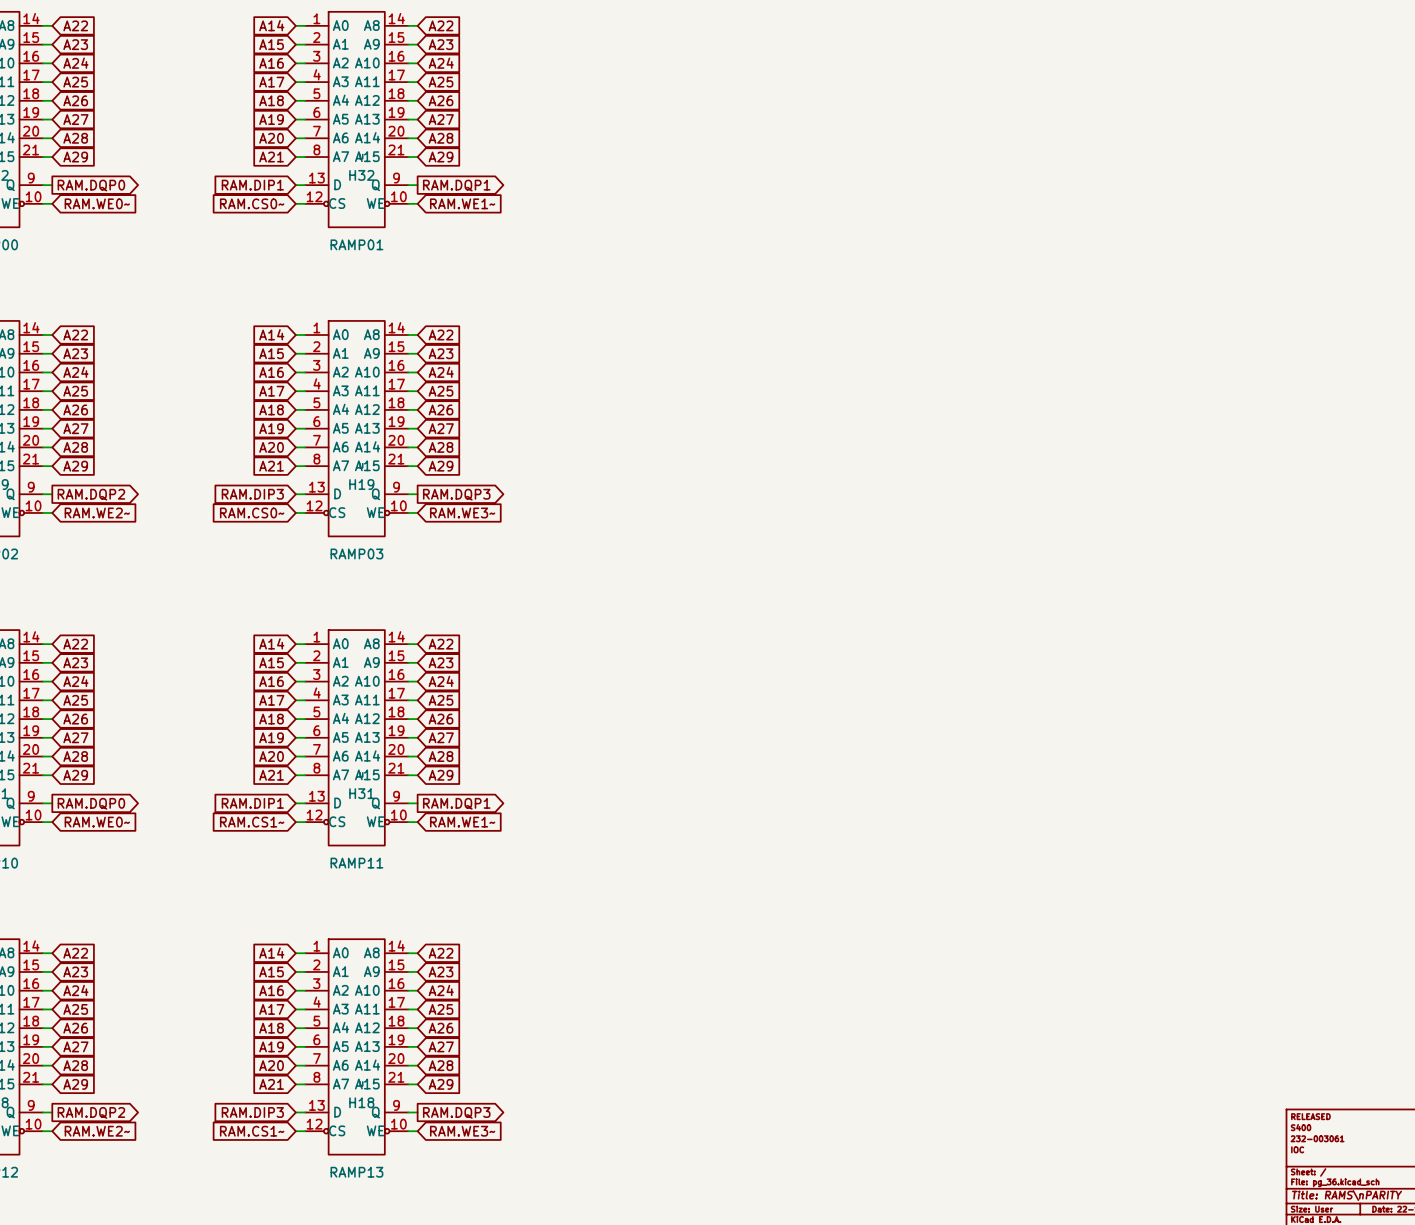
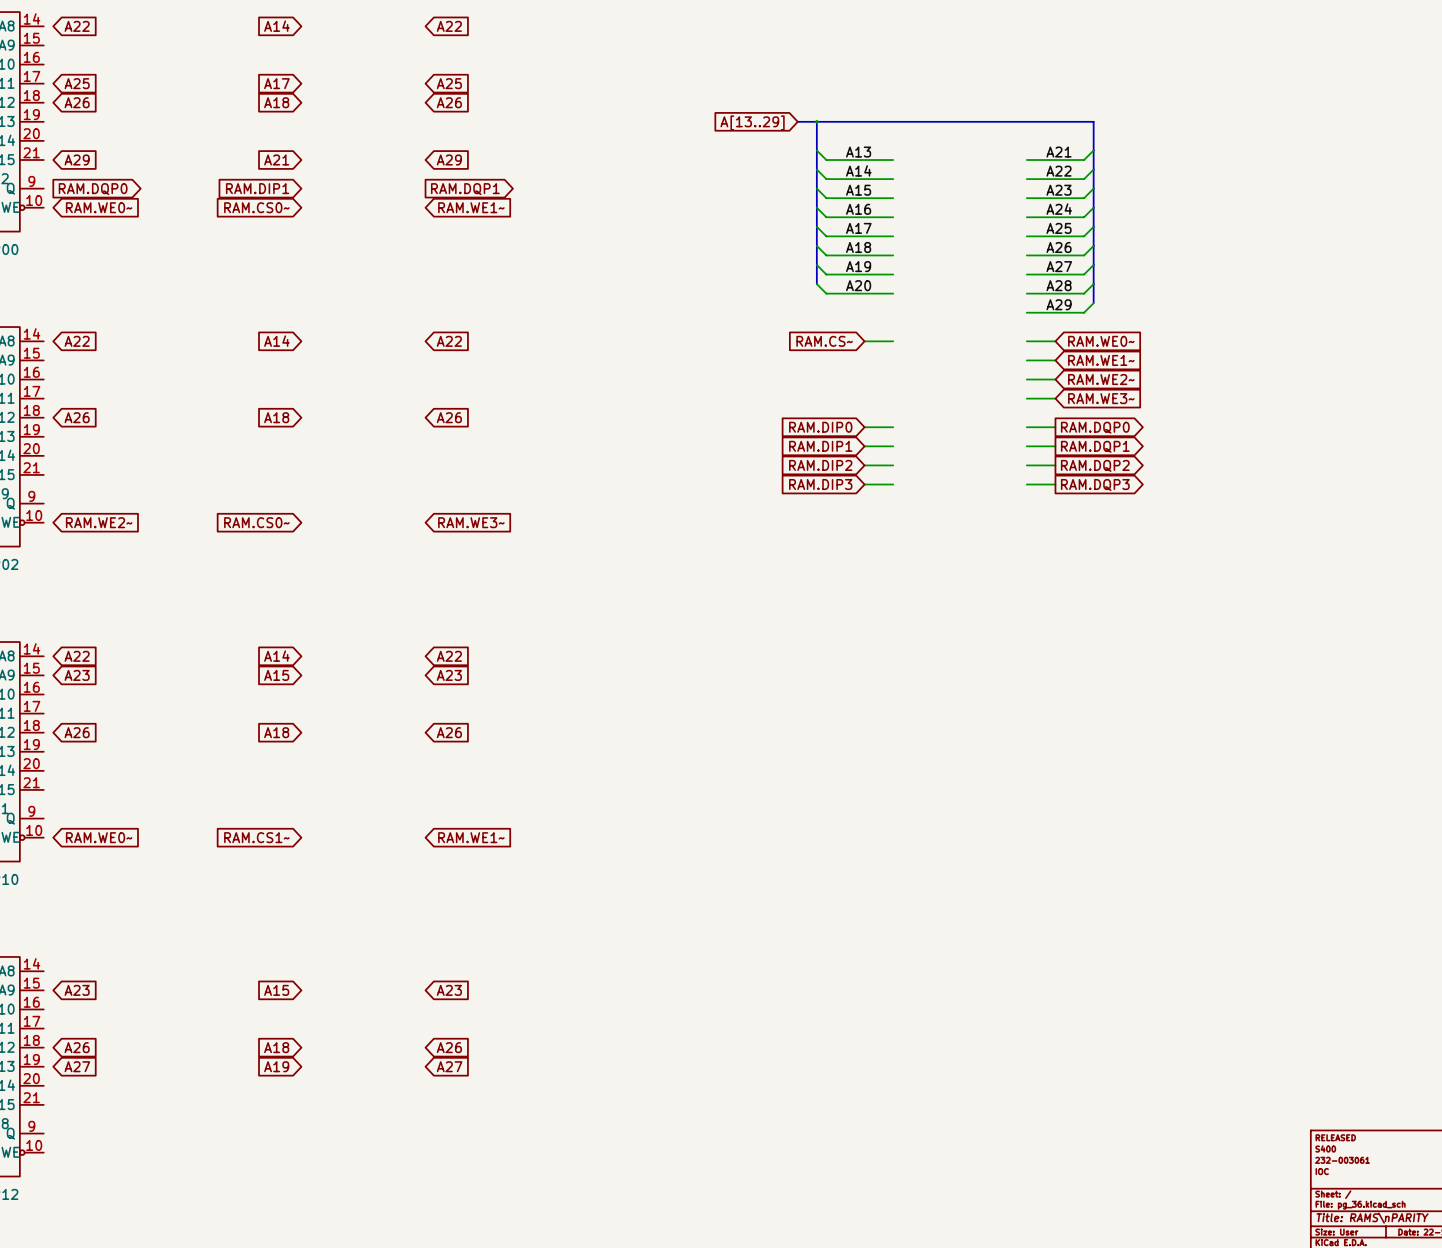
wire: (42, 25) (52, 25) -> none
wire: (295, 25) (305, 25) -> none
wire: (408, 25) (417, 25) -> none
wire: (42, 44) (52, 44) -> none
global label: A23 (75, 44) -> none
global label: A15 (271, 44) -> none
wire: (295, 44) (305, 44) -> none
wire: (408, 44) (417, 44) -> none
global label: A23 (441, 44) -> none
wire: (42, 63) (52, 63) -> none
global label: A24 (75, 63) -> none
global label: A16 (271, 63) -> none
wire: (295, 63) (305, 63) -> none
wire: (408, 63) (417, 63) -> none
global label: A24 (441, 63) -> none
wire: (42, 82) (52, 82) -> none
wire: (295, 82) (305, 82) -> none
wire: (408, 82) (417, 82) -> none
wire: (42, 100) (52, 100) -> none
wire: (295, 100) (305, 100) -> none
wire: (408, 100) (417, 100) -> none
wire: (42, 119) (52, 119) -> none
global label: A27 (75, 119) -> none
global label: A19 (271, 119) -> none
wire: (295, 119) (305, 119) -> none
part: (356, 119) -> none
wire: (408, 119) (417, 119) -> none
global label: A27 (441, 119) -> none
bus: none -> (797, 121) (1093, 121) (1093, 303)
bus: none -> (816, 121) (816, 284)
junction: none -> (816, 121)
global label: none -> A[13..29] (752, 122)
wire: (42, 138) (52, 138) -> none
global label: A28 (75, 138) -> none
global label: A20 (271, 138) -> none
wire: (295, 138) (305, 138) -> none
wire: (408, 138) (417, 138) -> none
global label: A28 (441, 138) -> none
wire: none -> (816, 150) (826, 160) (893, 160)
wire: none -> (1093, 150) (1084, 160) (1026, 160)
label: none -> A13 (858, 152)
label: none -> A21 (1059, 152)
wire: (42, 157) (52, 157) -> none
wire: (295, 157) (305, 157) -> none
wire: (408, 157) (417, 157) -> none
wire: none -> (816, 169) (826, 179) (893, 179)
wire: none -> (1093, 169) (1084, 179) (1026, 179)
label: none -> A14 (858, 170)
label: none -> A22 (1059, 171)
wire: (42, 185) (52, 185) -> none
wire: (295, 185) (305, 185) -> none
wire: (408, 185) (417, 185) -> none
wire: none -> (816, 188) (826, 198) (893, 198)
wire: none -> (1093, 188) (1084, 198) (1026, 198)
label: none -> A15 (858, 190)
label: none -> A23 (1059, 190)
wire: (42, 203) (52, 203) -> none
wire: (295, 203) (305, 203) -> none
wire: (408, 203) (417, 203) -> none
wire: none -> (816, 207) (826, 217) (893, 217)
wire: none -> (1093, 207) (1084, 217) (1026, 217)
label: none -> A16 (858, 209)
label: none -> A24 (1059, 209)
wire: none -> (816, 226) (826, 236) (893, 236)
wire: none -> (1093, 226) (1084, 236) (1026, 236)
label: none -> A17 (858, 228)
label: none -> A25 (1059, 228)
wire: none -> (816, 245) (826, 255) (893, 255)
wire: none -> (1093, 245) (1084, 255) (1026, 255)
label: none -> A18 (858, 247)
label: none -> A26 (1059, 247)
wire: none -> (816, 264) (826, 274) (893, 274)
wire: none -> (1093, 264) (1084, 274) (1026, 274)
label: none -> A19 (858, 266)
label: none -> A27 (1059, 266)
wire: none -> (816, 284) (826, 293) (893, 293)
wire: none -> (1093, 284) (1084, 293) (1026, 293)
label: none -> A20 (858, 285)
label: none -> A28 (1059, 285)
wire: none -> (1093, 303) (1084, 312) (1026, 312)
label: none -> A29 (1059, 304)
wire: (42, 335) (52, 335) -> none
wire: (295, 335) (305, 335) -> none
wire: (408, 335) (417, 335) -> none
global label: none -> RAM.CS~ (824, 341)
wire: none -> (864, 341) (893, 341)
wire: none -> (1026, 341) (1055, 341)
global label: none -> RAM.WE0~ (1101, 341)
wire: (42, 353) (52, 353) -> none
global label: A23 (75, 353) -> none
global label: A15 (271, 353) -> none
wire: (295, 353) (305, 353) -> none
wire: (408, 353) (417, 353) -> none
global label: A23 (441, 353) -> none
wire: none -> (1026, 360) (1055, 360)
global label: none -> RAM.WE1~ (1101, 360)
wire: (42, 372) (52, 372) -> none
global label: A24 (75, 372) -> none
global label: A16 (271, 372) -> none
wire: (295, 372) (305, 372) -> none
wire: (408, 372) (417, 372) -> none
global label: A24 (441, 372) -> none
wire: none -> (1026, 379) (1055, 379)
global label: none -> RAM.WE2~ (1101, 379)
wire: (42, 391) (52, 391) -> none
global label: A25 (75, 391) -> none
global label: A17 (271, 391) -> none
wire: (295, 391) (305, 391) -> none
wire: (408, 391) (417, 391) -> none
global label: A25 (441, 391) -> none
wire: none -> (1026, 398) (1055, 398)
global label: none -> RAM.WE3~ (1101, 398)
wire: (42, 409) (52, 409) -> none
wire: (295, 409) (305, 409) -> none
wire: (408, 409) (417, 409) -> none
global label: none -> RAM.DIP0 (820, 427)
wire: none -> (864, 427) (893, 427)
wire: none -> (1026, 427) (1055, 427)
global label: none -> RAM.DQP0 (1095, 427)
wire: (42, 428) (52, 428) -> none
global label: A27 (75, 428) -> none
global label: A19 (271, 428) -> none
wire: (295, 428) (305, 428) -> none
part: (356, 428) -> none
wire: (408, 428) (417, 428) -> none
global label: A27 (441, 428) -> none
global label: none -> RAM.DIP1 (820, 446)
wire: none -> (864, 446) (893, 446)
wire: none -> (1026, 446) (1055, 446)
global label: none -> RAM.DQP1 (1095, 446)
wire: (42, 447) (52, 447) -> none
global label: A28 (75, 447) -> none
global label: A20 (271, 447) -> none
wire: (295, 447) (305, 447) -> none
wire: (408, 447) (417, 447) -> none
global label: A28 (441, 447) -> none
global label: none -> RAM.DIP2 (820, 465)
wire: none -> (864, 465) (893, 465)
wire: none -> (1026, 465) (1055, 465)
global label: none -> RAM.DQP2 (1095, 465)
wire: (42, 466) (52, 466) -> none
global label: A29 (75, 466) -> none
global label: A21 (271, 466) -> none
wire: (295, 466) (305, 466) -> none
wire: (408, 466) (417, 466) -> none
global label: A29 (441, 466) -> none
global label: none -> RAM.DIP3 (820, 484)
wire: none -> (864, 484) (893, 484)
wire: none -> (1026, 484) (1055, 484)
global label: none -> RAM.DQP3 (1095, 484)
wire: (42, 494) (52, 494) -> none
global label: RAM.DQP2 (91, 494) -> none
global label: RAM.DIP3 (252, 494) -> none
wire: (295, 494) (305, 494) -> none
wire: (408, 494) (417, 494) -> none
global label: RAM.DQP3 (456, 494) -> none
wire: (42, 512) (52, 512) -> none
wire: (295, 512) (305, 512) -> none
wire: (408, 512) (417, 512) -> none
wire: (42, 644) (52, 644) -> none
wire: (295, 644) (305, 644) -> none
wire: (408, 644) (417, 644) -> none
wire: (42, 662) (52, 662) -> none
wire: (295, 662) (305, 662) -> none
wire: (408, 662) (417, 662) -> none
wire: (42, 681) (52, 681) -> none
global label: A24 (75, 681) -> none
global label: A16 (271, 681) -> none
wire: (295, 681) (305, 681) -> none
wire: (408, 681) (417, 681) -> none
global label: A24 (441, 681) -> none
wire: (42, 700) (52, 700) -> none
global label: A25 (75, 700) -> none
global label: A17 (271, 700) -> none
wire: (295, 700) (305, 700) -> none
wire: (408, 700) (417, 700) -> none
global label: A25 (441, 700) -> none
wire: (42, 719) (52, 719) -> none
wire: (295, 719) (305, 719) -> none
wire: (408, 719) (417, 719) -> none
wire: (42, 737) (52, 737) -> none
global label: A27 (75, 737) -> none
global label: A19 (271, 737) -> none
wire: (295, 737) (305, 737) -> none
part: (356, 737) -> none
wire: (408, 737) (417, 737) -> none
global label: A27 (441, 737) -> none
wire: (42, 756) (52, 756) -> none
global label: A28 (75, 756) -> none
global label: A20 (271, 756) -> none
wire: (295, 756) (305, 756) -> none
wire: (408, 756) (417, 756) -> none
global label: A28 (441, 756) -> none
wire: (42, 775) (52, 775) -> none
global label: A29 (75, 775) -> none
global label: A21 (271, 775) -> none
wire: (295, 775) (305, 775) -> none
wire: (408, 775) (417, 775) -> none
global label: A29 (441, 775) -> none
wire: (42, 803) (52, 803) -> none
global label: RAM.DQP0 (91, 803) -> none
global label: RAM.DIP1 (252, 803) -> none
wire: (295, 803) (305, 803) -> none
wire: (408, 803) (417, 803) -> none
global label: RAM.DQP1 (456, 803) -> none
wire: (42, 822) (52, 822) -> none
wire: (295, 822) (305, 822) -> none
wire: (408, 822) (417, 822) -> none
wire: (42, 953) (52, 953) -> none
global label: A22 (75, 953) -> none
global label: A14 (271, 953) -> none
wire: (295, 953) (305, 953) -> none
wire: (408, 953) (417, 953) -> none
global label: A22 (441, 953) -> none
wire: (42, 971) (52, 971) -> none
wire: (295, 971) (305, 971) -> none
wire: (408, 971) (417, 971) -> none
wire: (42, 990) (52, 990) -> none
global label: A24 (75, 990) -> none
global label: A16 (271, 990) -> none
wire: (295, 990) (305, 990) -> none
wire: (408, 990) (417, 990) -> none
global label: A24 (441, 990) -> none
wire: (42, 1009) (52, 1009) -> none
global label: A25 (75, 1009) -> none
global label: A17 (271, 1009) -> none
wire: (295, 1009) (305, 1009) -> none
wire: (408, 1009) (417, 1009) -> none
global label: A25 (441, 1009) -> none
wire: (42, 1028) (52, 1028) -> none
wire: (295, 1028) (305, 1028) -> none
wire: (408, 1028) (417, 1028) -> none
wire: (42, 1046) (52, 1046) -> none
wire: (295, 1046) (305, 1046) -> none
part: (356, 1046) -> none
wire: (408, 1046) (417, 1046) -> none
wire: (42, 1065) (52, 1065) -> none
global label: A28 (75, 1065) -> none
global label: A20 (271, 1065) -> none
wire: (295, 1065) (305, 1065) -> none
wire: (408, 1065) (417, 1065) -> none
global label: A28 (441, 1065) -> none
wire: (42, 1084) (52, 1084) -> none
global label: A29 (75, 1084) -> none
global label: A21 (271, 1084) -> none
wire: (295, 1084) (305, 1084) -> none
wire: (408, 1084) (417, 1084) -> none
global label: A29 (441, 1084) -> none
wire: (42, 1112) (52, 1112) -> none
global label: RAM.DQP2 (91, 1112) -> none
global label: RAM.DIP3 (252, 1112) -> none
wire: (295, 1112) (305, 1112) -> none
wire: (408, 1112) (417, 1112) -> none
global label: RAM.DQP3 (456, 1112) -> none
wire: (42, 1131) (52, 1131) -> none
global label: RAM.WE2~ (97, 1131) -> none
global label: RAM.CS1~ (252, 1131) -> none
wire: (295, 1131) (305, 1131) -> none
wire: (408, 1131) (417, 1131) -> none
global label: RAM.WE3~ (462, 1131) -> none

